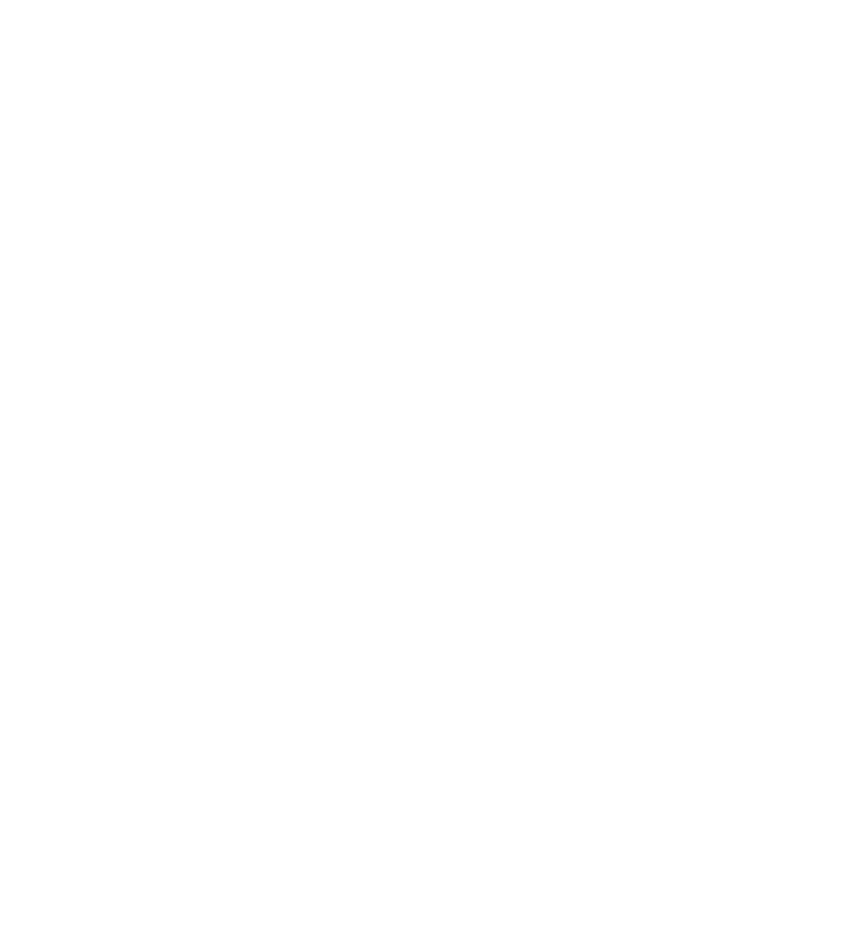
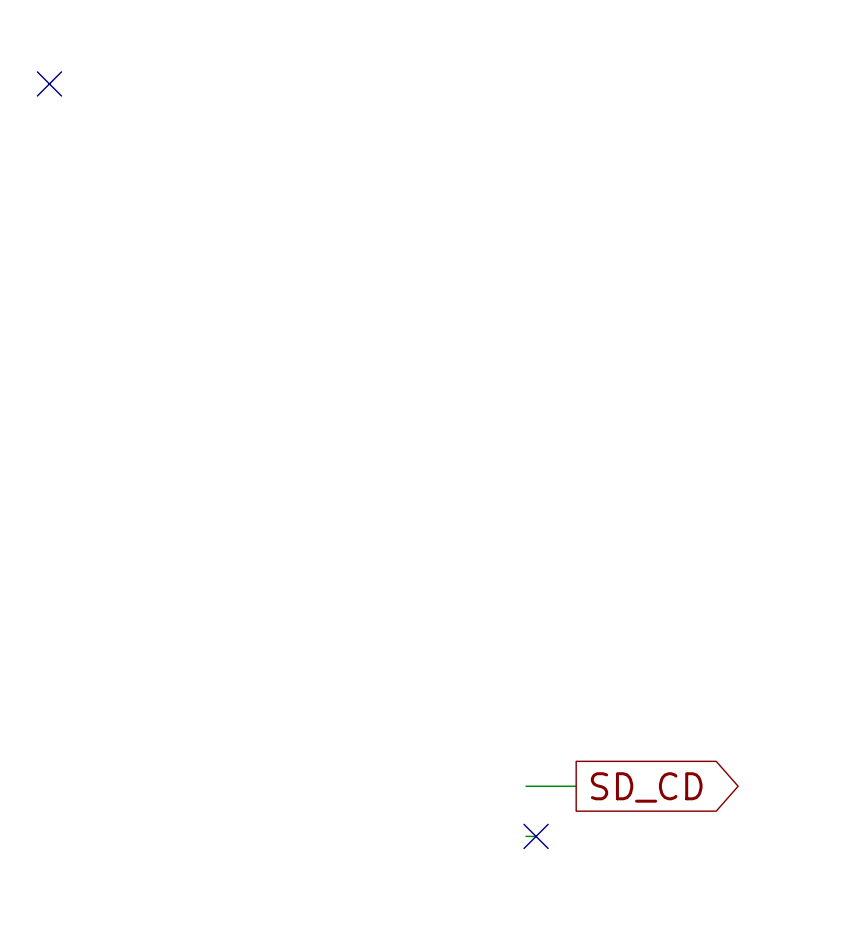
no-connect mark: none -> (49, 83)
wire: none -> (526, 786) (576, 786)
global label: none -> SD_CD (646, 787)
wire: none -> (526, 836) (536, 836)
no-connect mark: none -> (536, 836)

